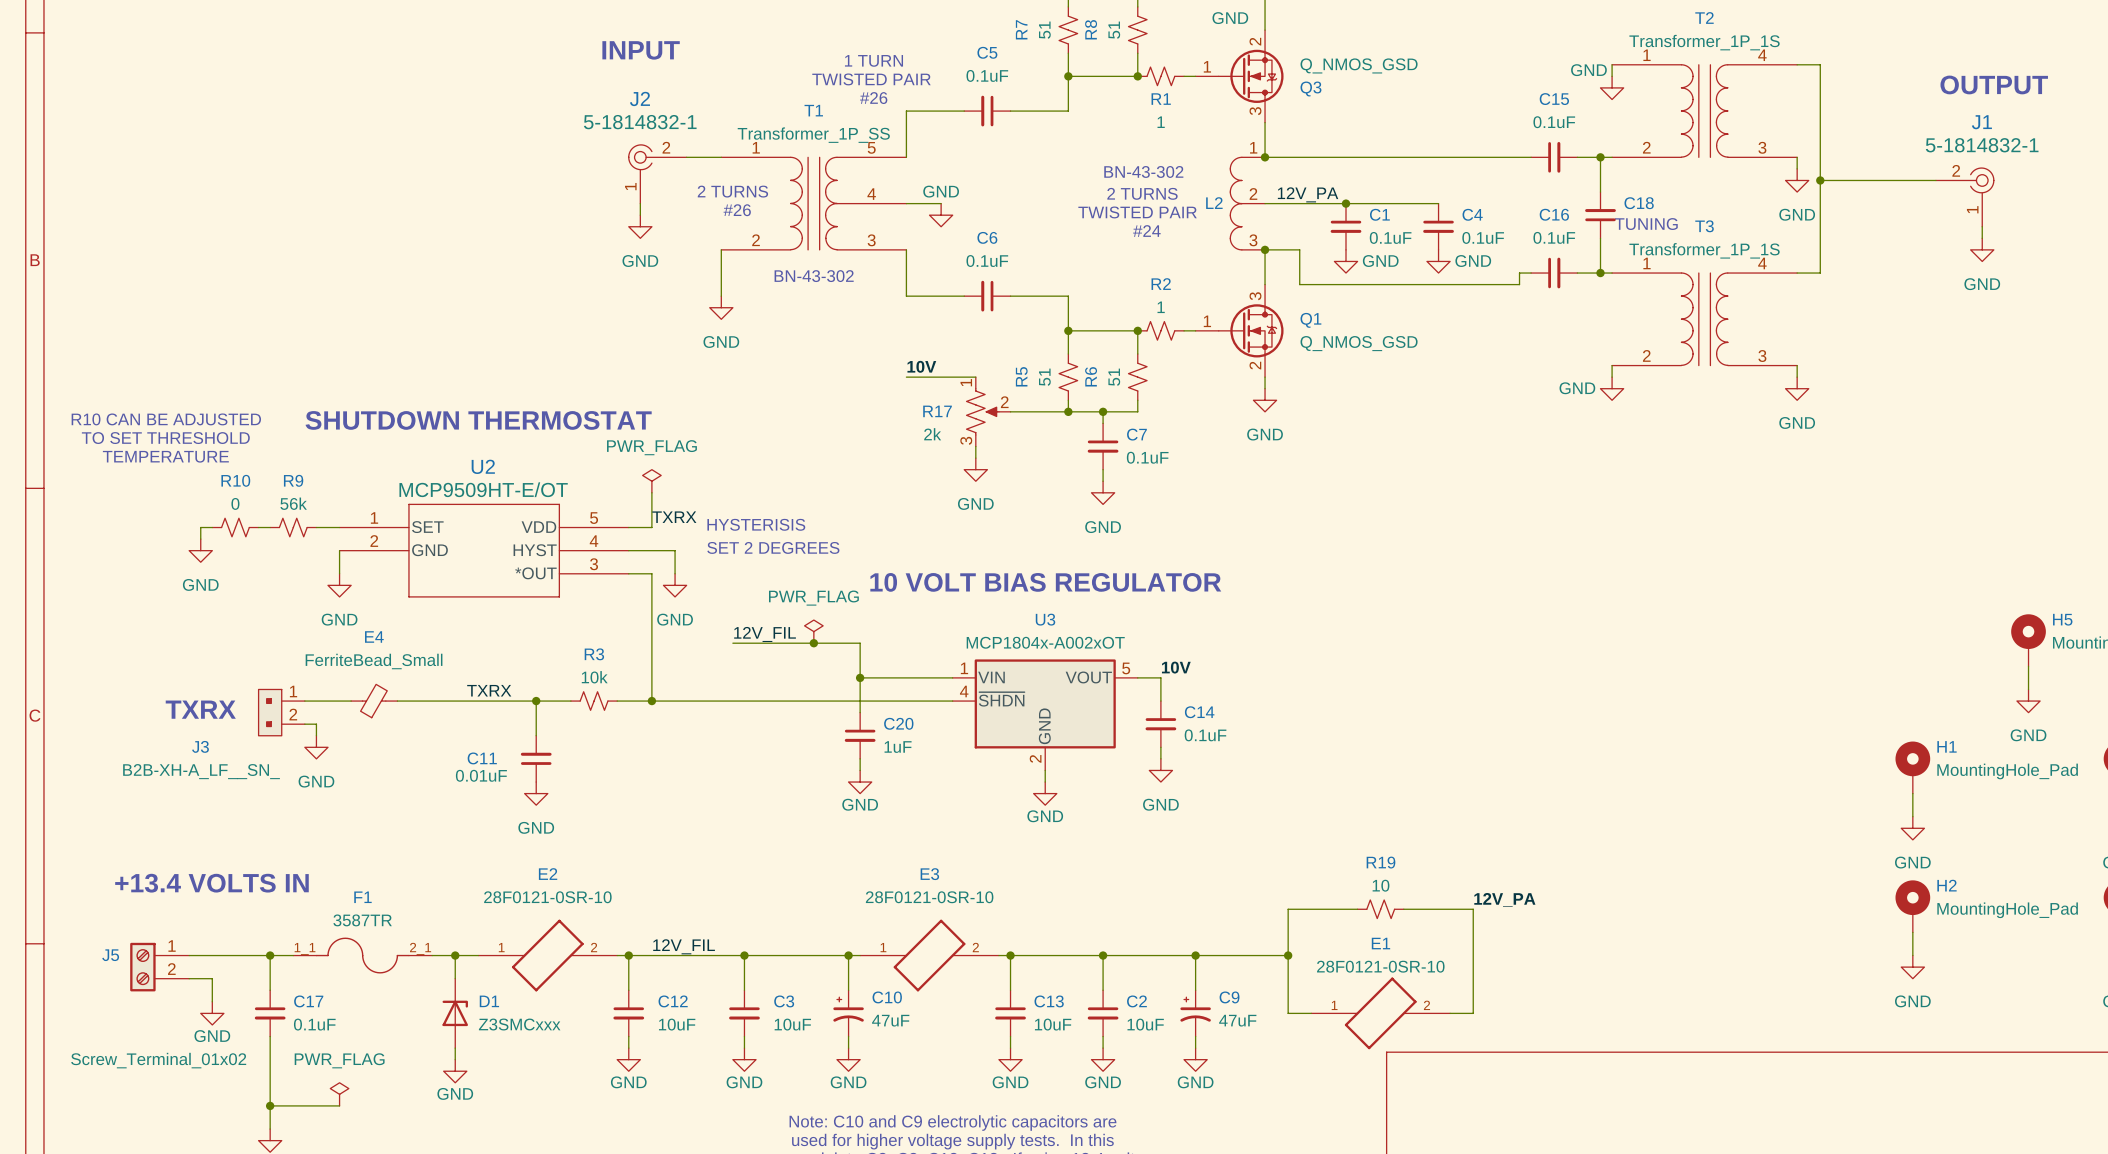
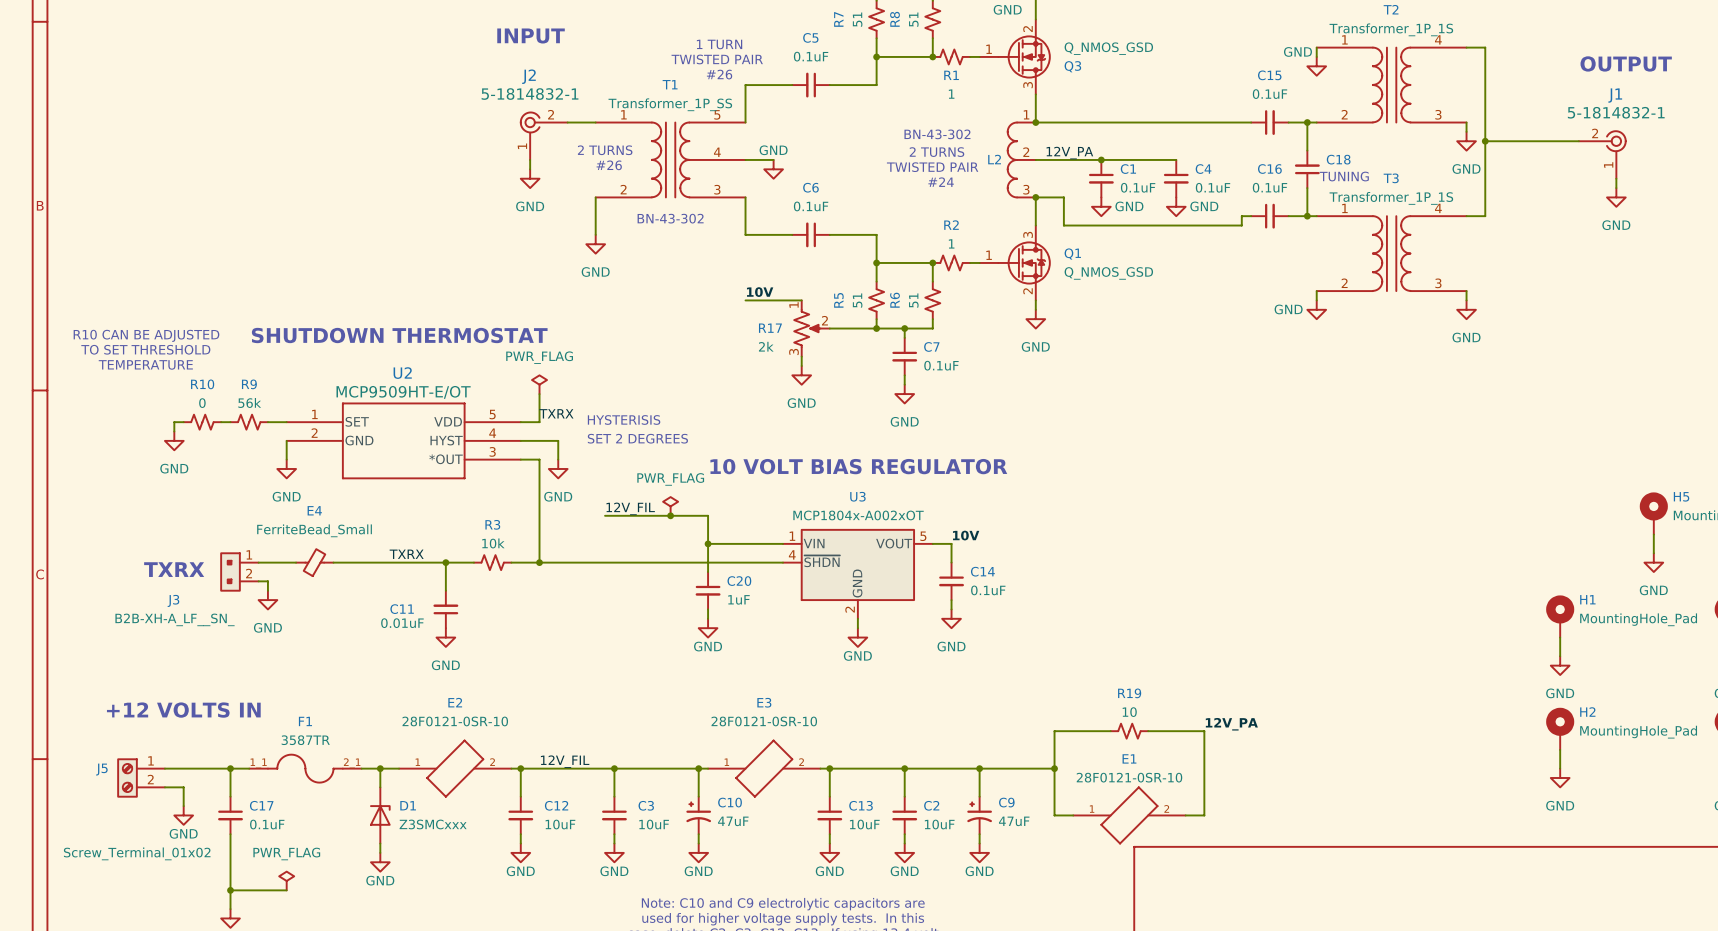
text: +13.4 VOLTS IN (211, 883) -> +12 VOLTS IN (183, 710)

